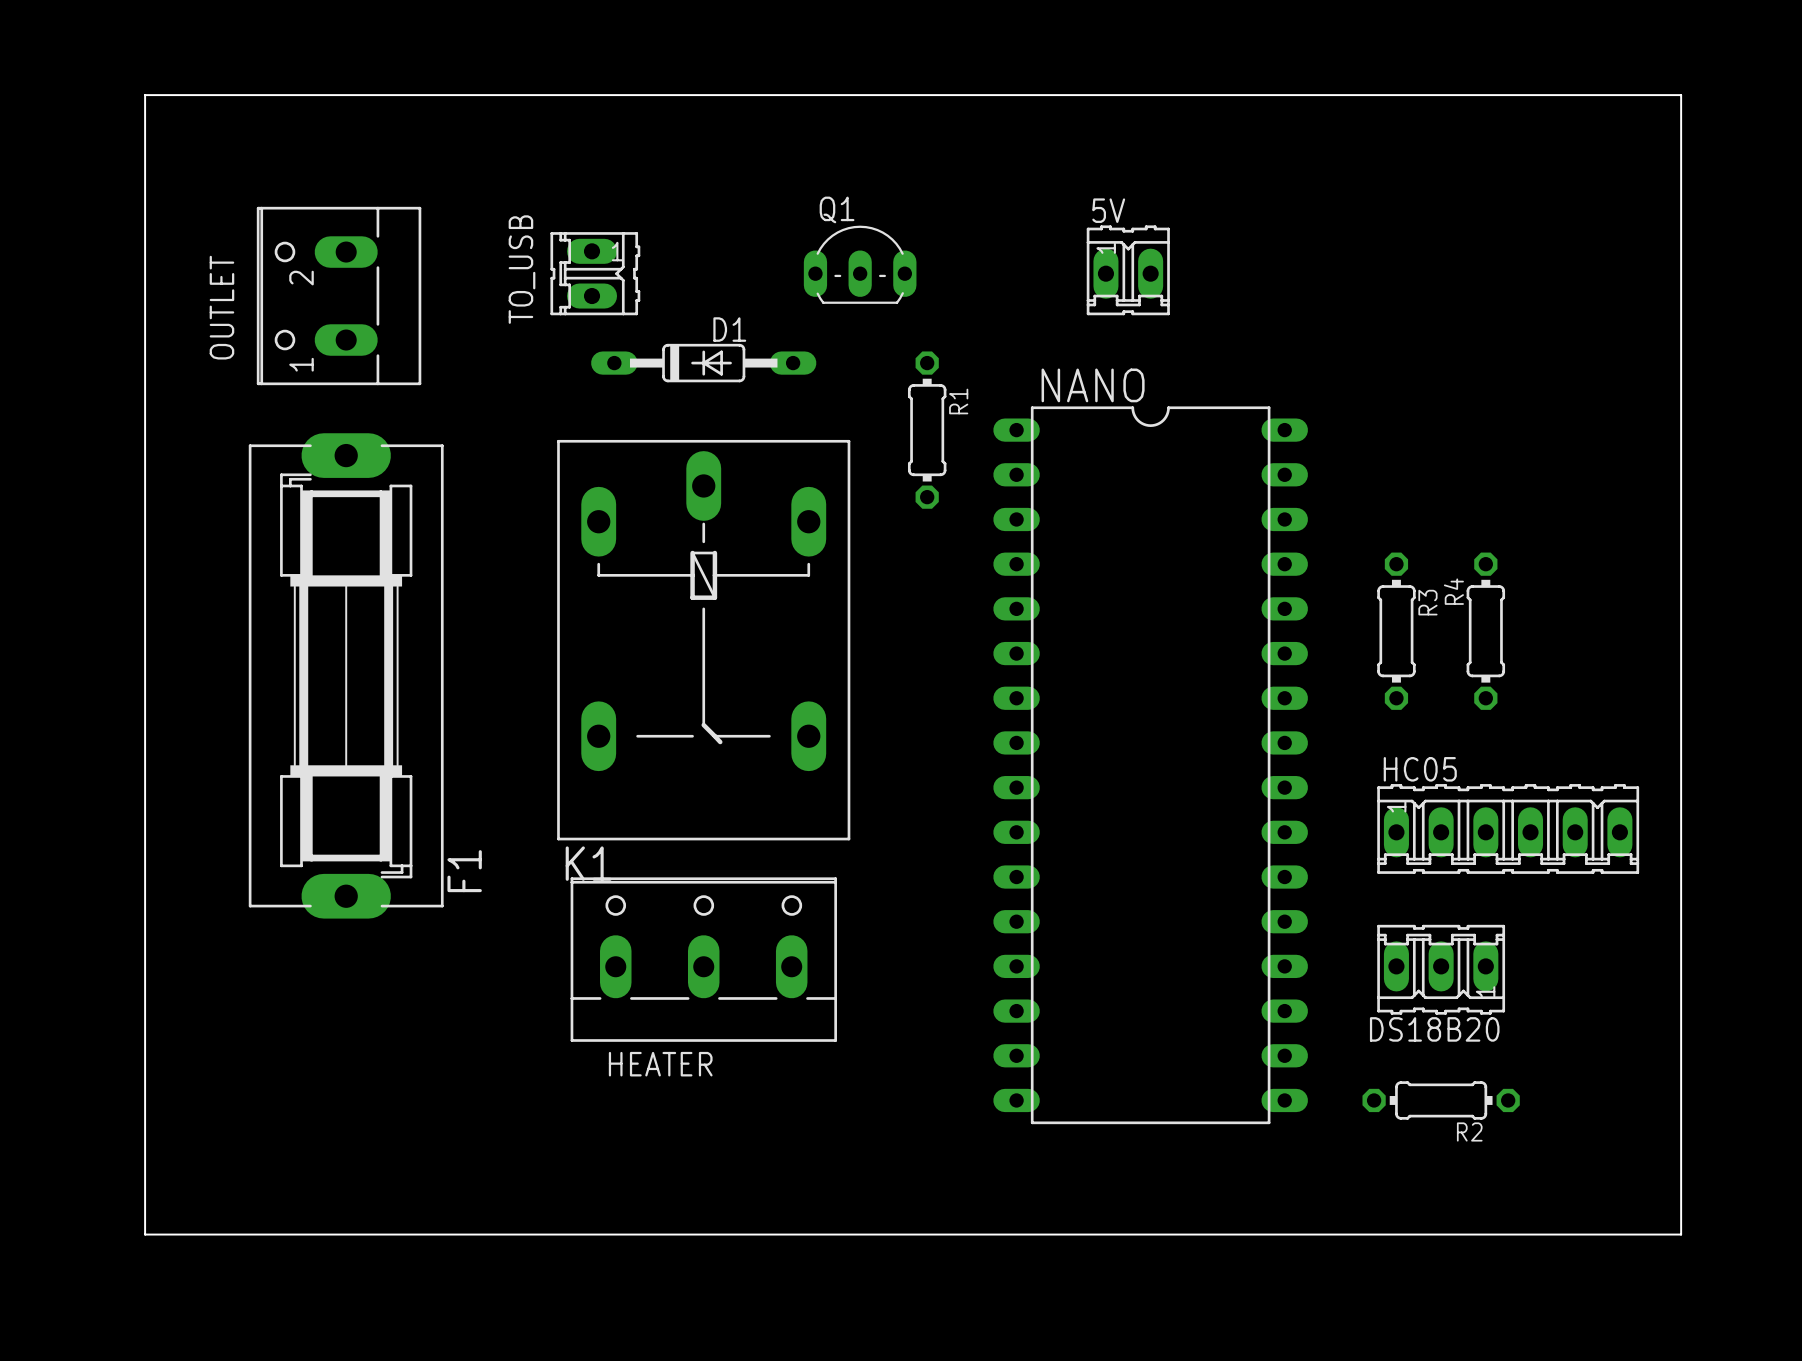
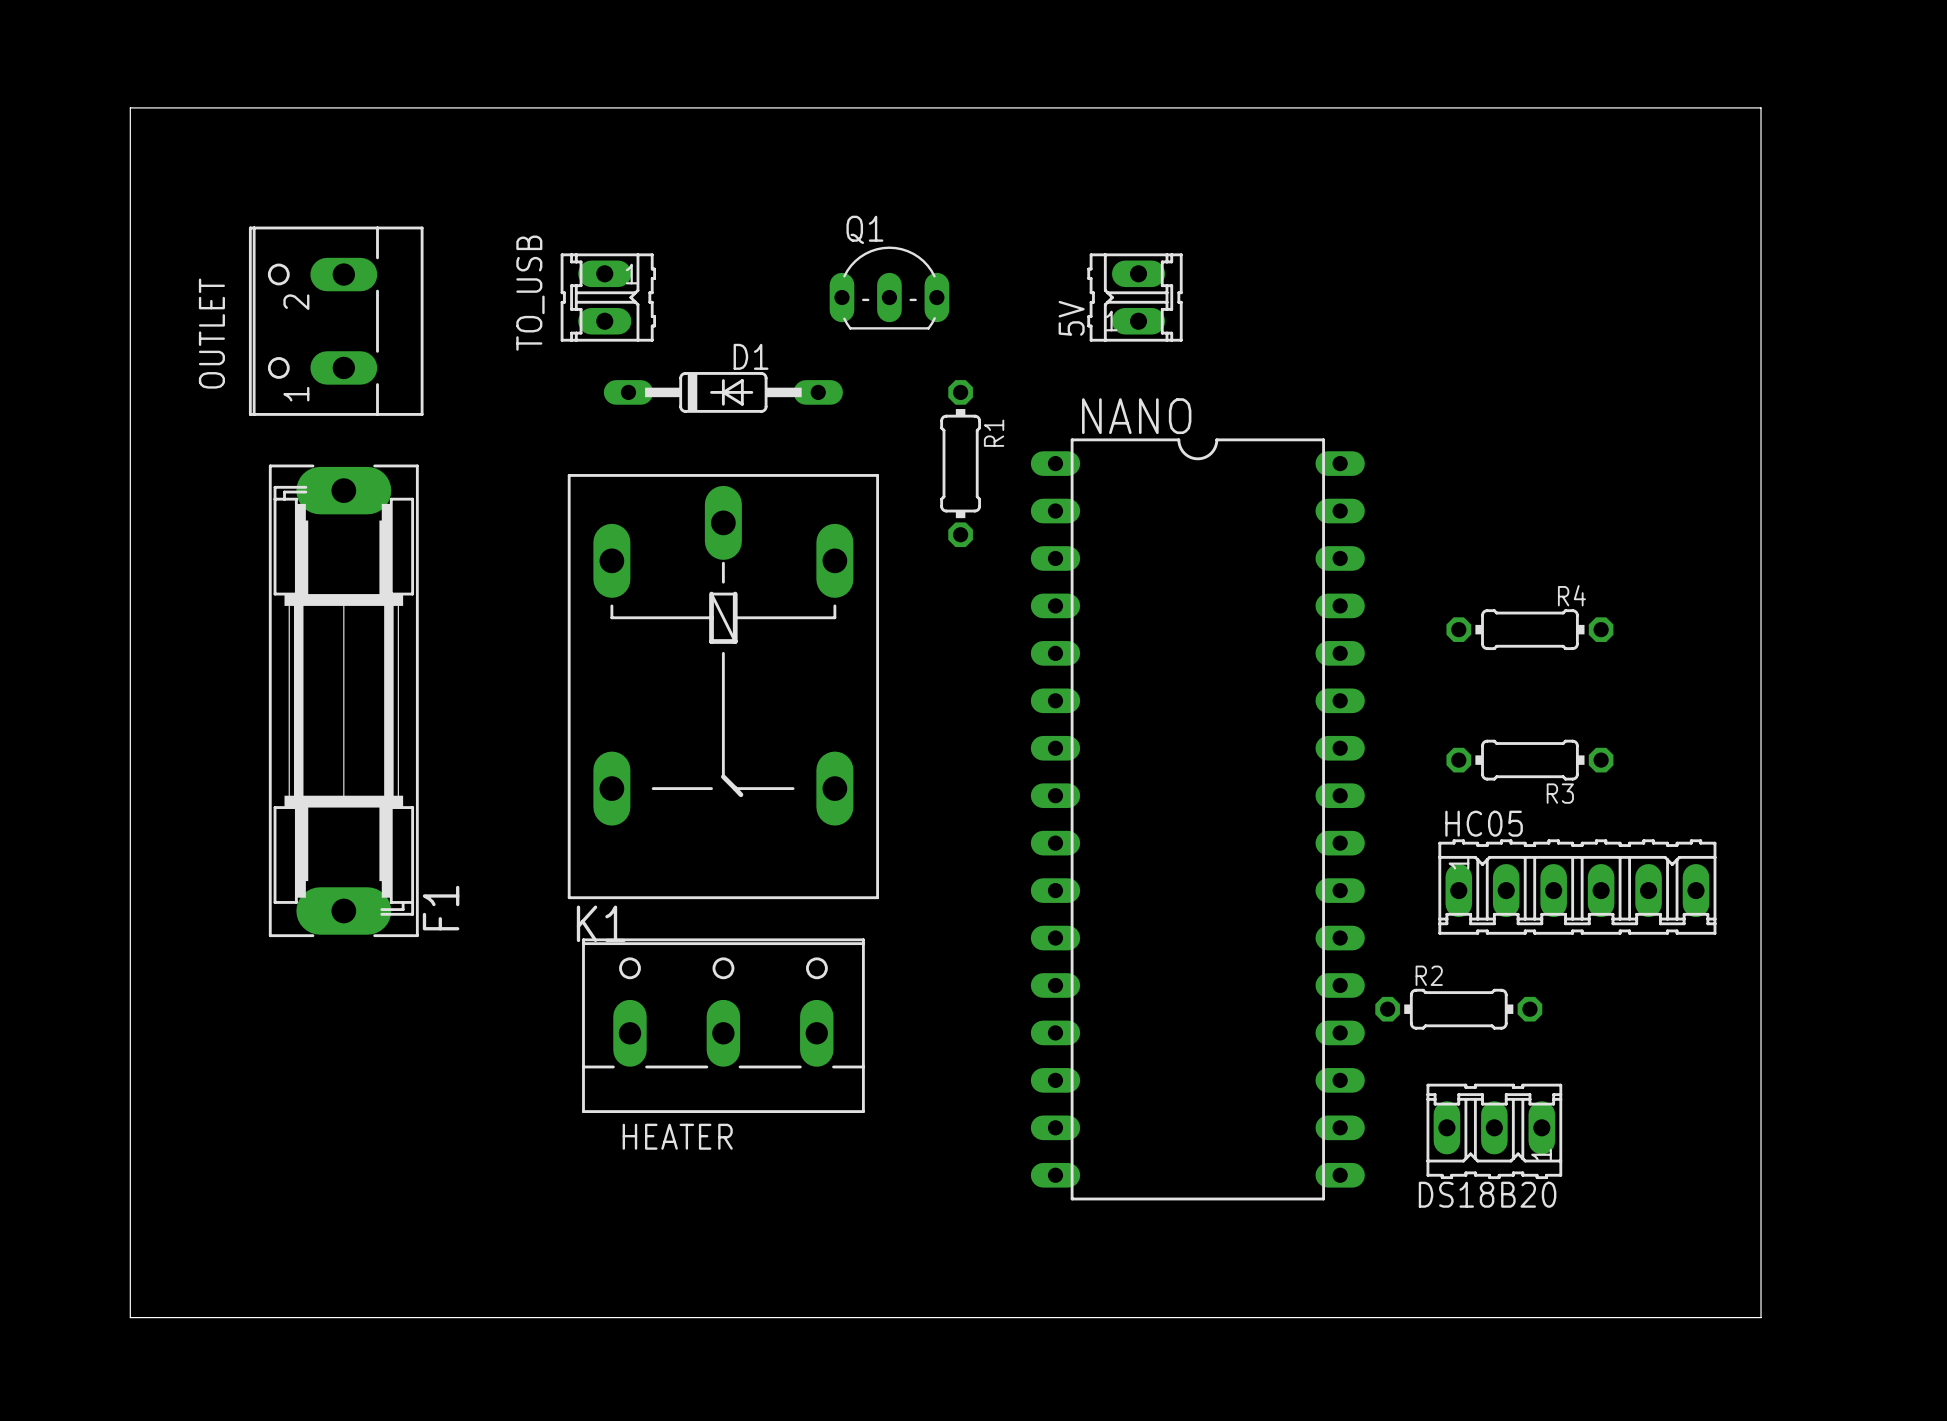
5V name position: 5V (1108, 210) -> 5V (1071, 318)
5V footprint: [1086, 225, 1170, 316] -> [1087, 253, 1183, 342]
F1 footprint: [248, 433, 444, 919] -> [268, 464, 419, 938]
R3 rotation: 0° (1396, 631) -> 90° clockwise (1529, 760)
R3 position: (1396, 631) -> (1529, 760)
R4 rotation: 0° (1485, 631) -> 90° clockwise (1529, 629)
DS18B20 position: (1441, 969) -> (1494, 1131)
R2 position: (1441, 1100) -> (1458, 1009)
R2 name position: R2 (1469, 1131) -> R2 (1429, 975)

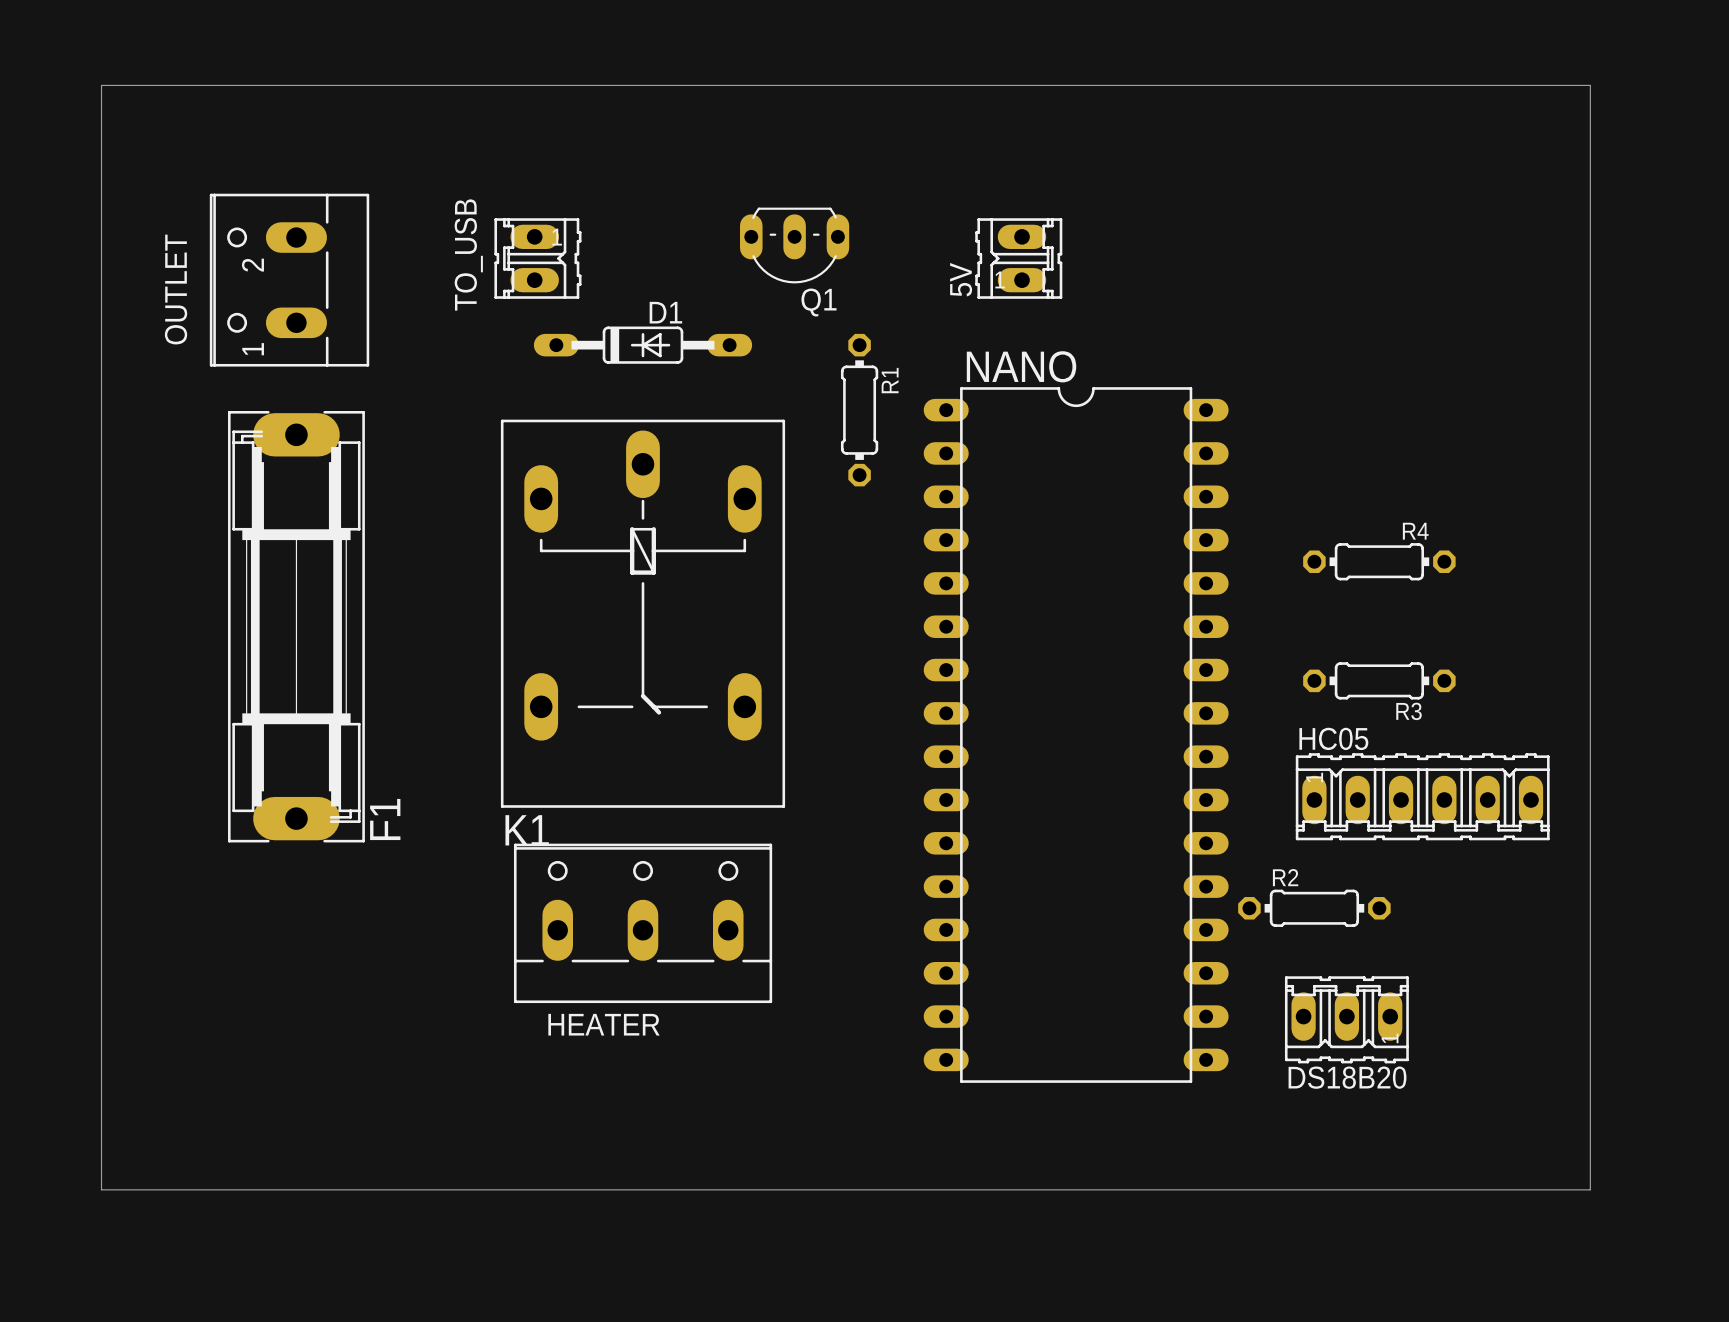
Q1 rotation: 0° (889, 288) -> 180° (794, 245)

